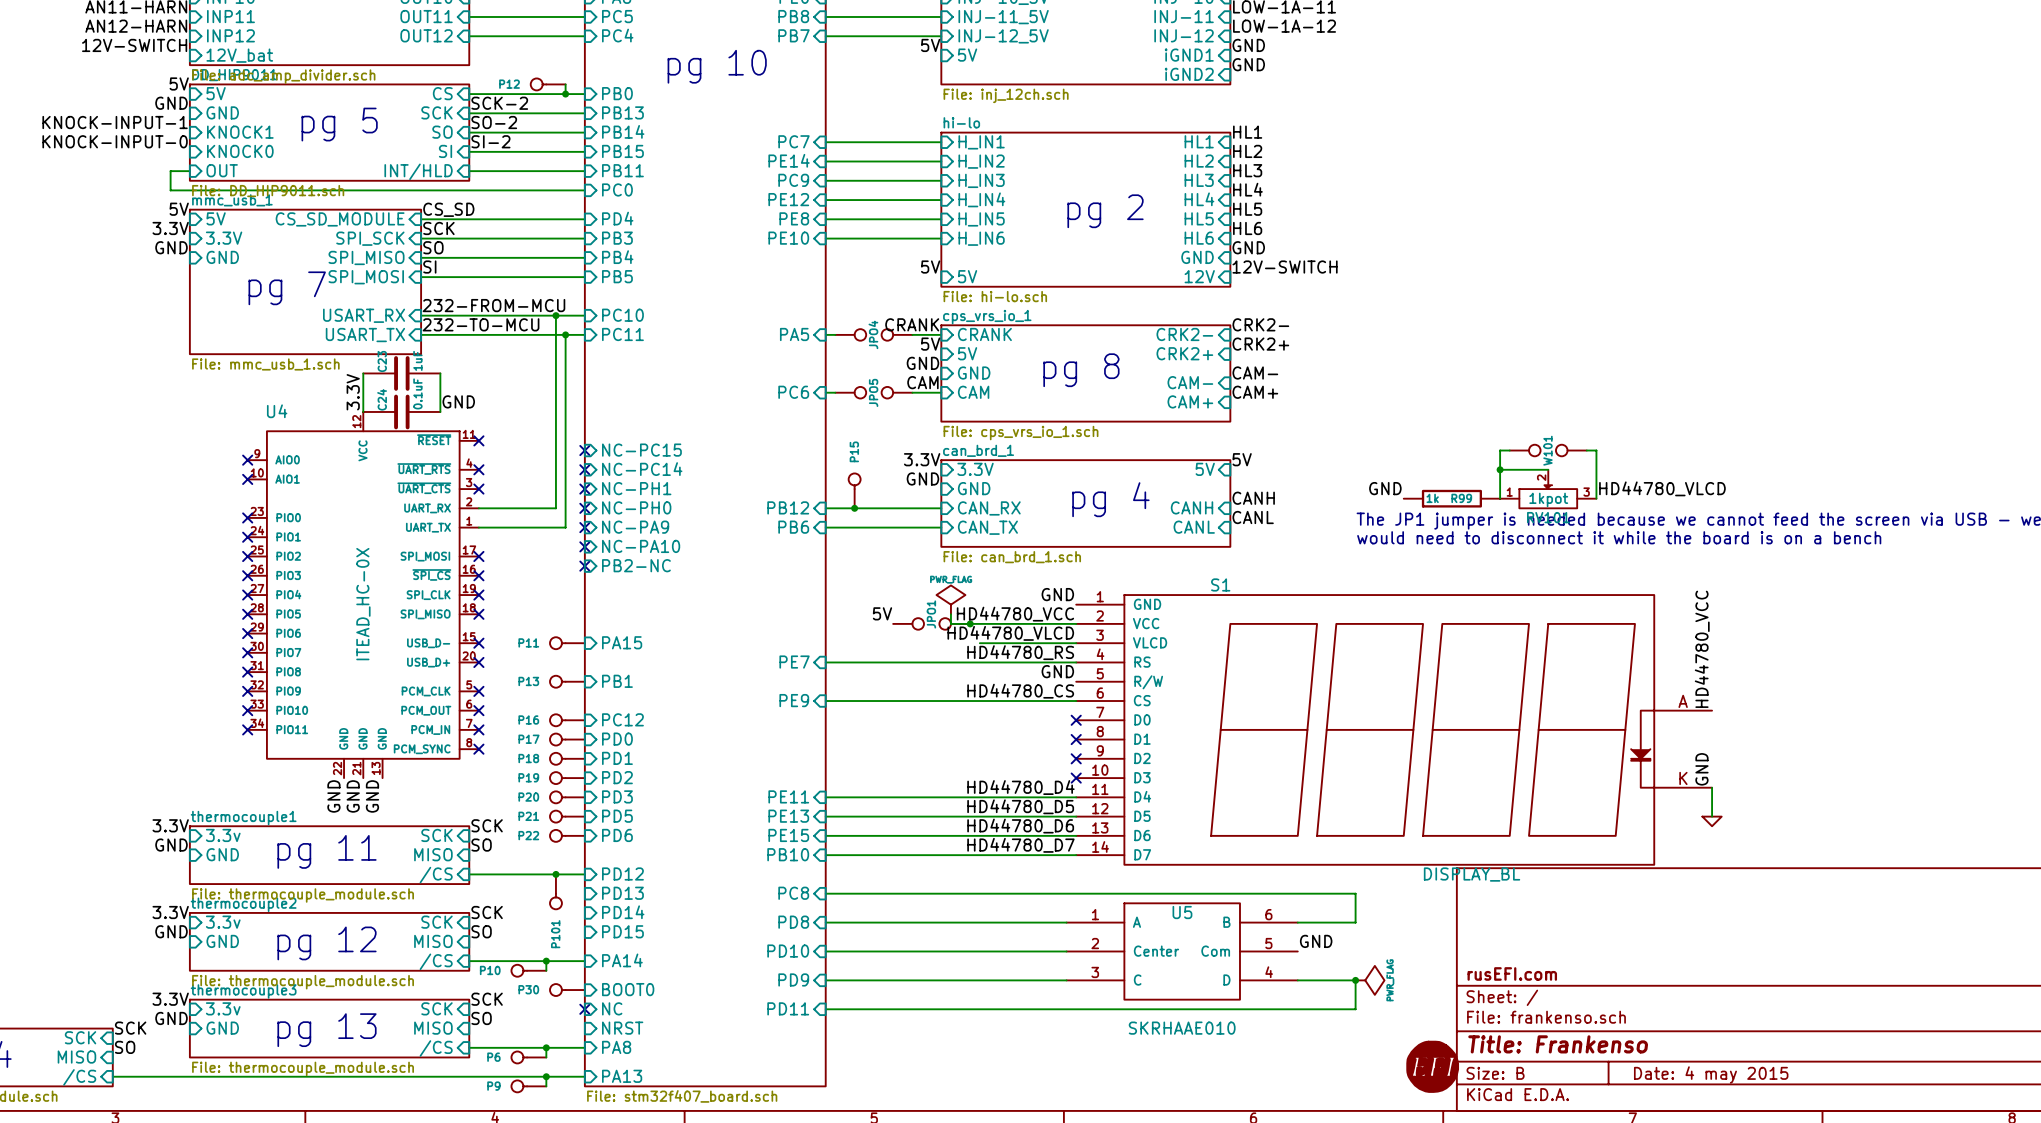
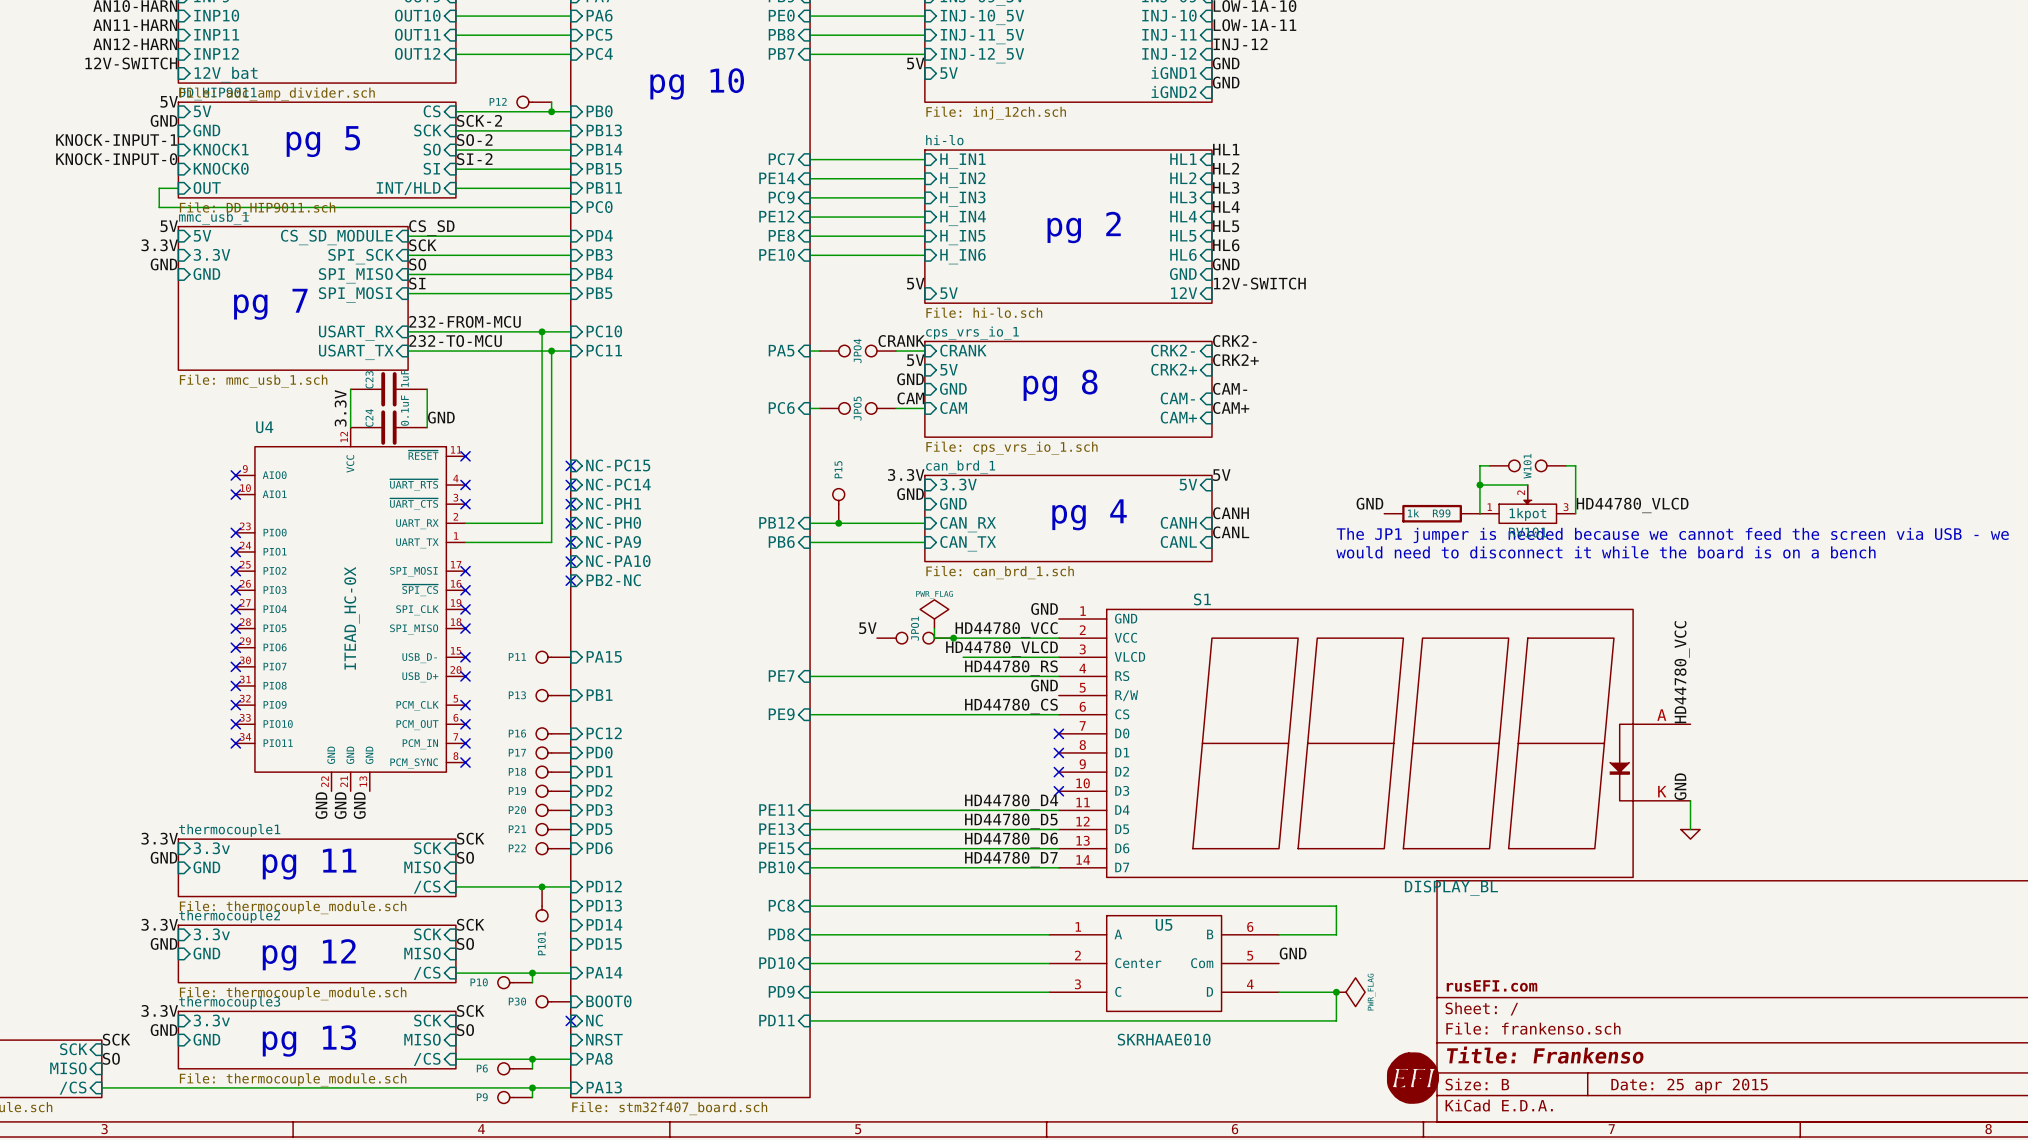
label: LOW-1A-12 (1284, 26) -> INJ-12 (1240, 44)
title block: Date: 4 may 2015 (1711, 1074) -> Date: 25 apr 2015 (1689, 1086)

